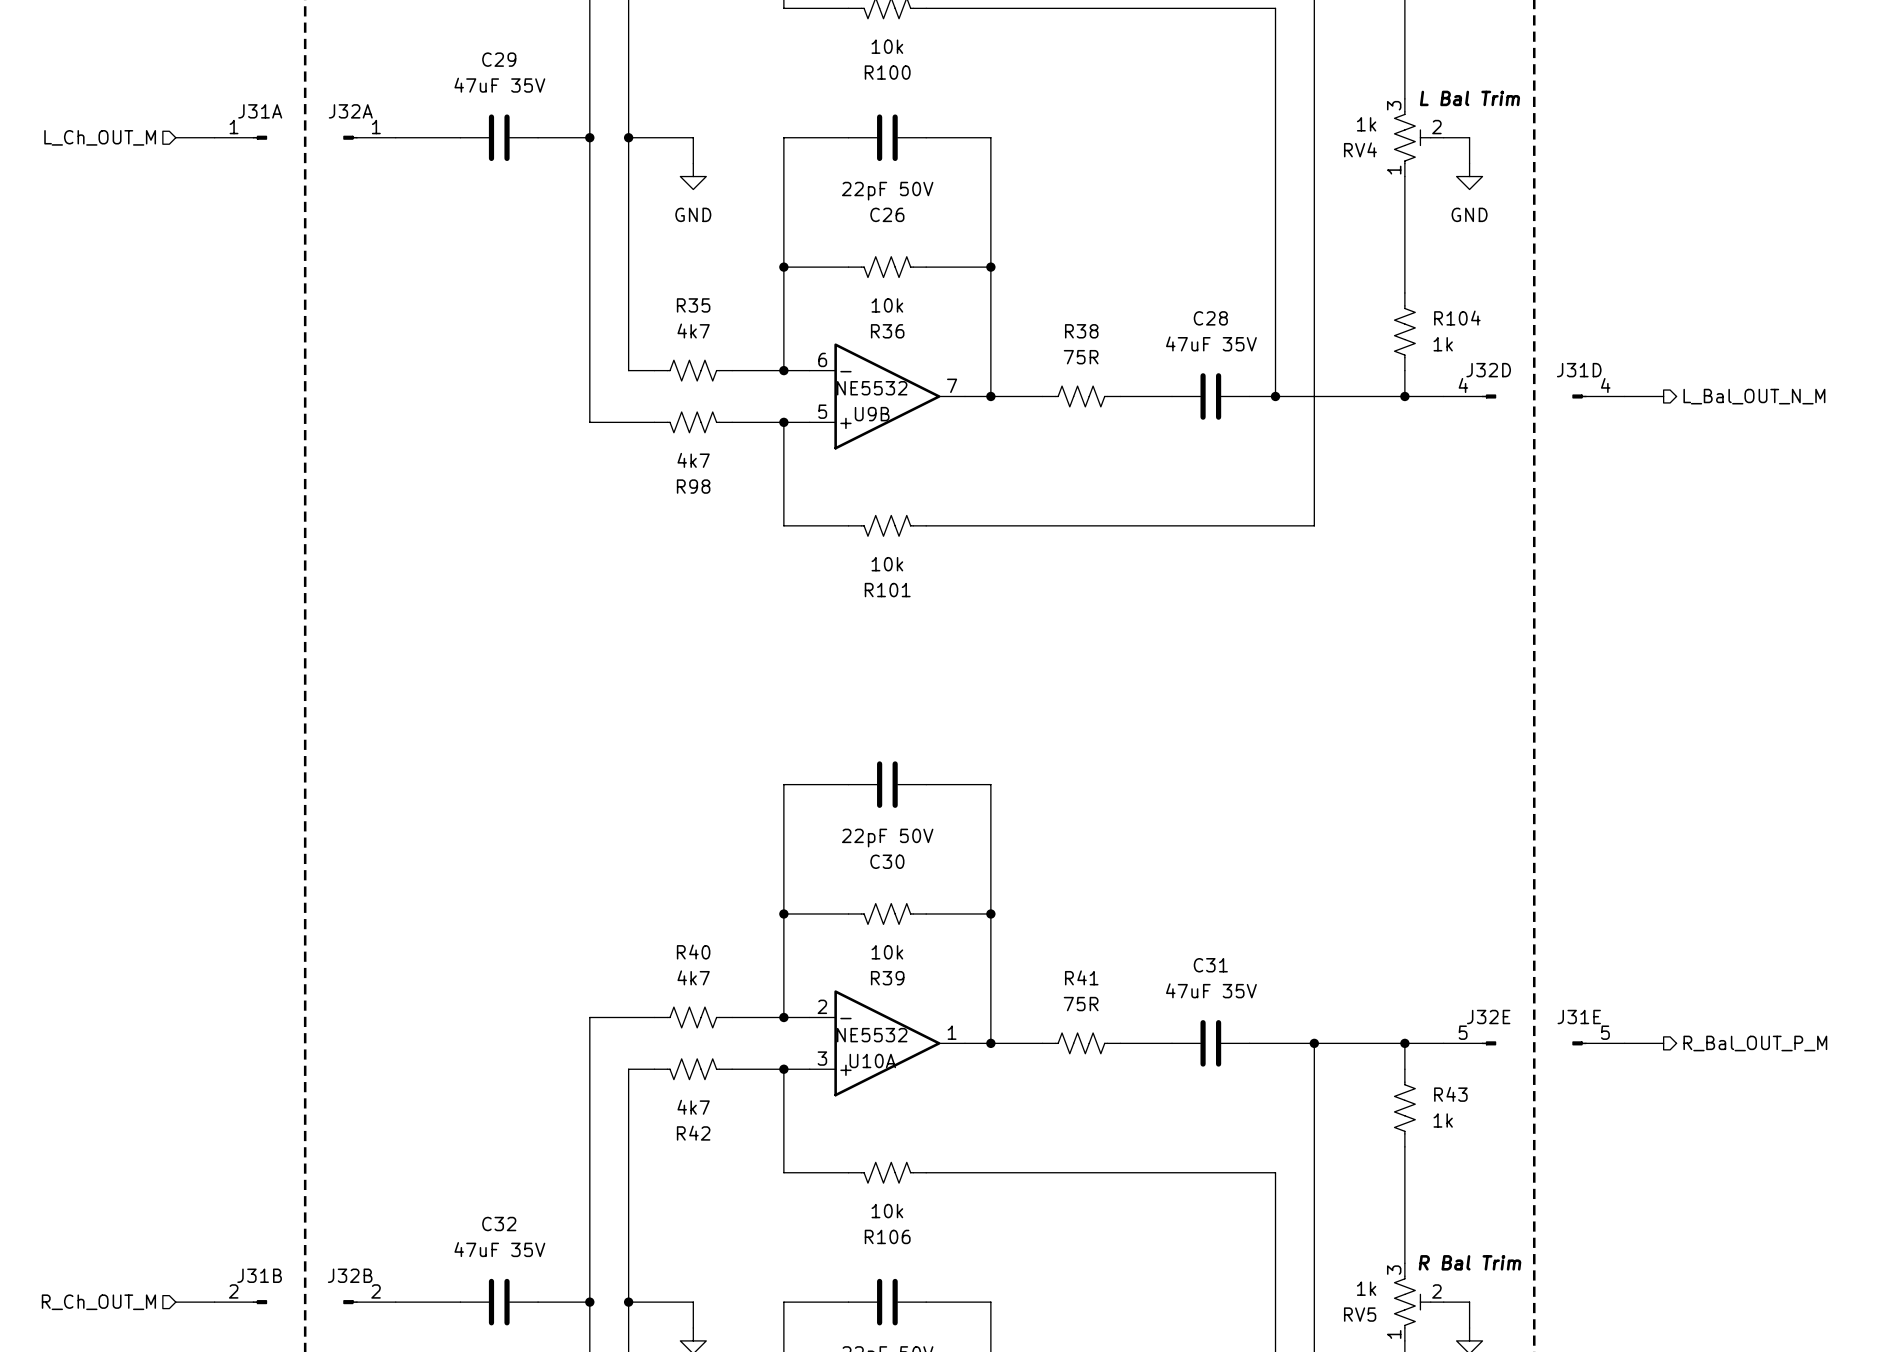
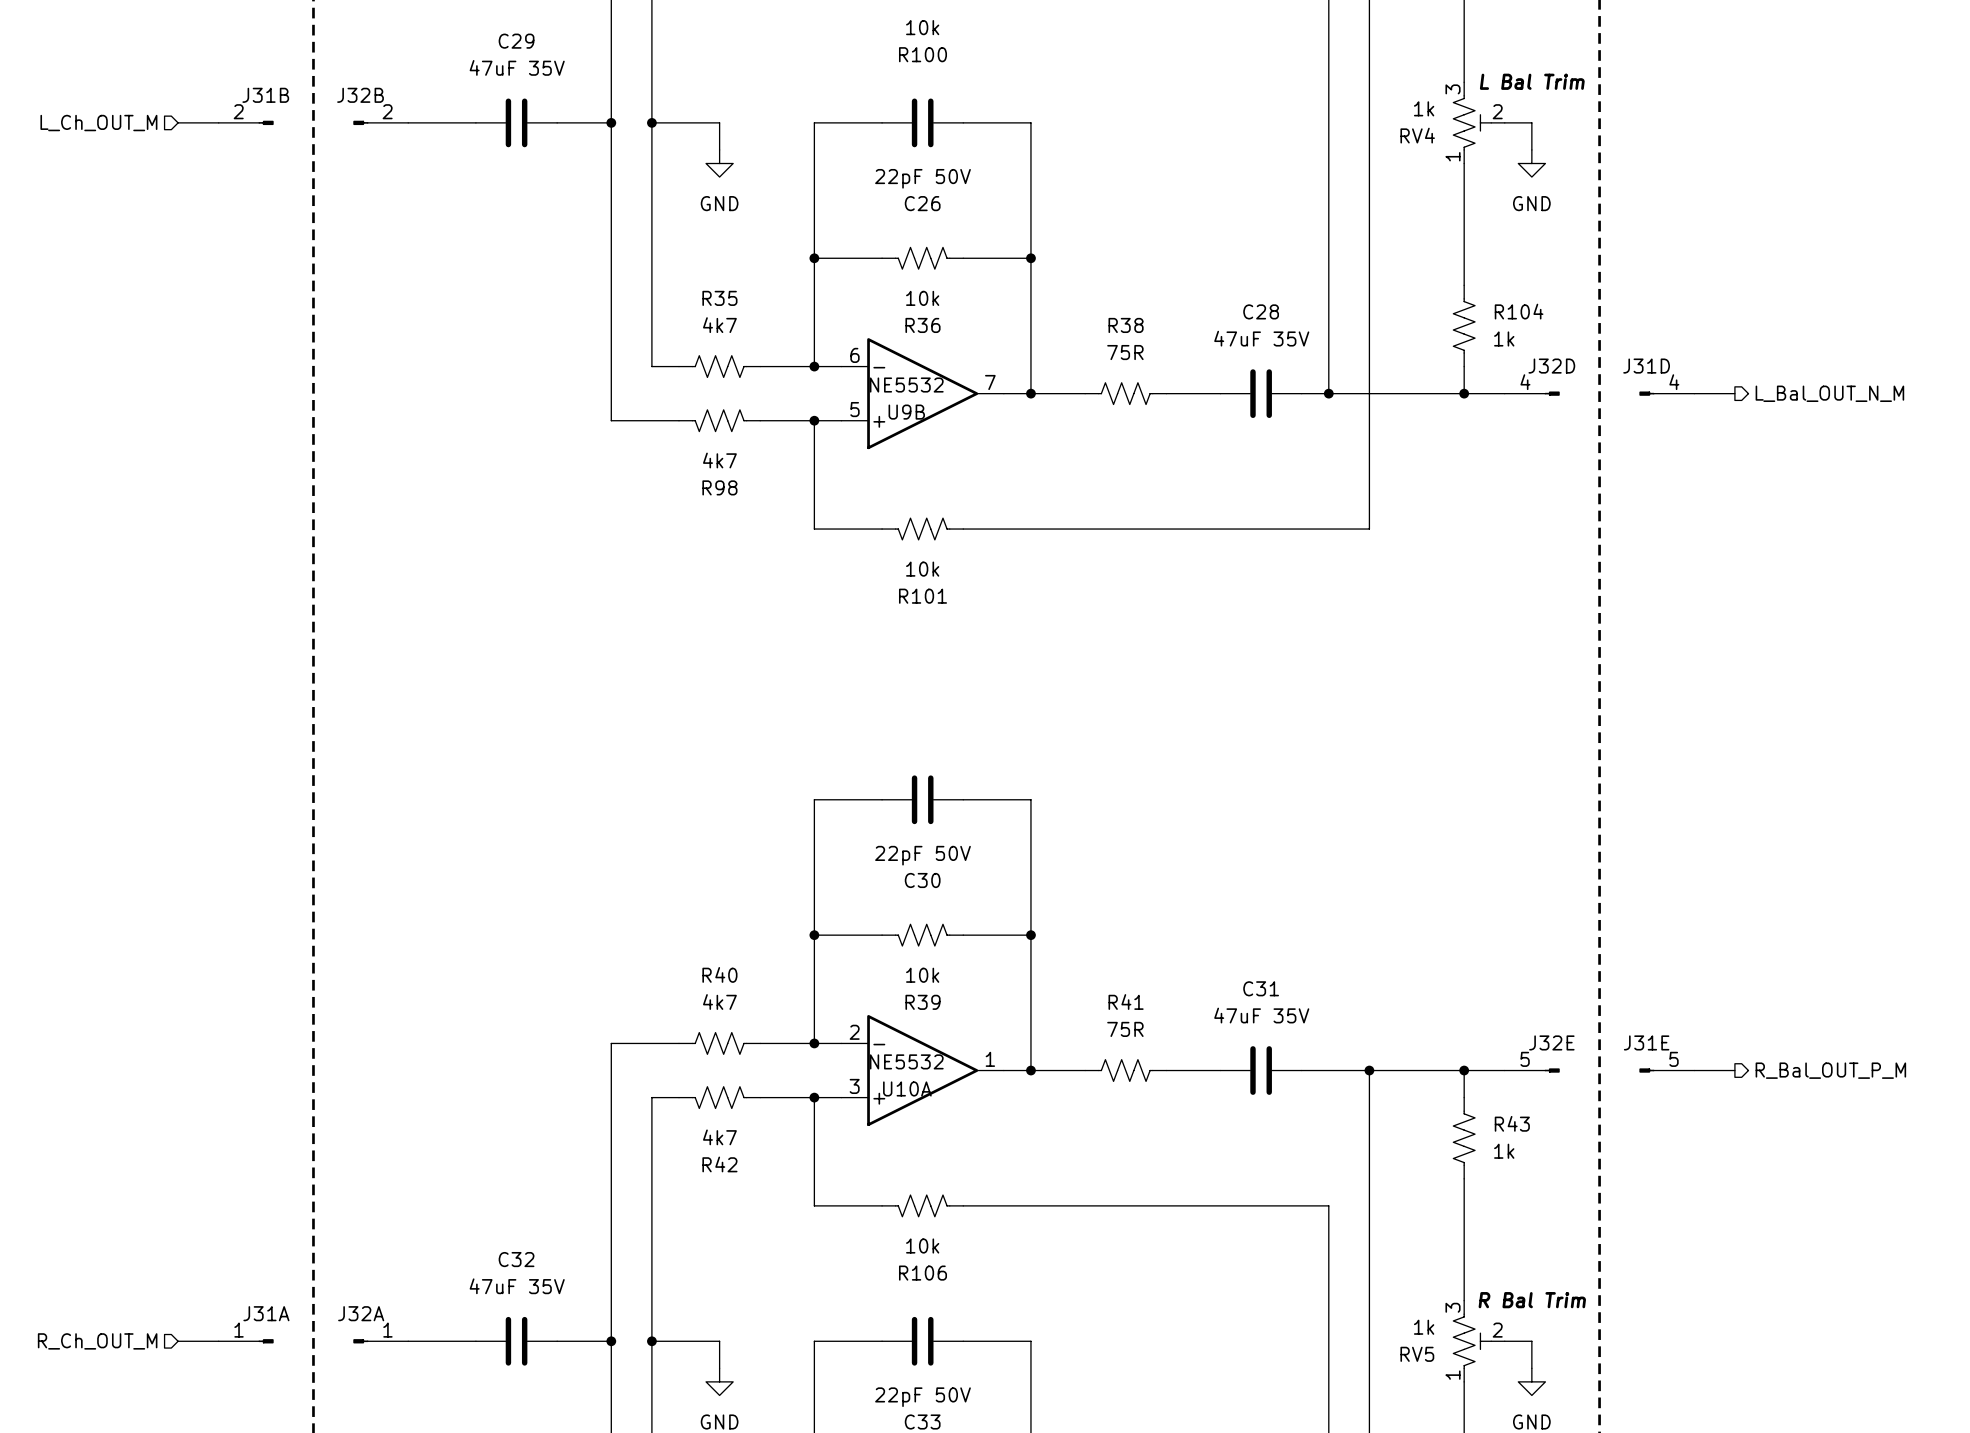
J31A position: (240, 137) -> (246, 1341)
J32A position: (369, 137) -> (380, 1341)
J31B position: (240, 1302) -> (246, 122)
J32B position: (369, 1302) -> (380, 122)

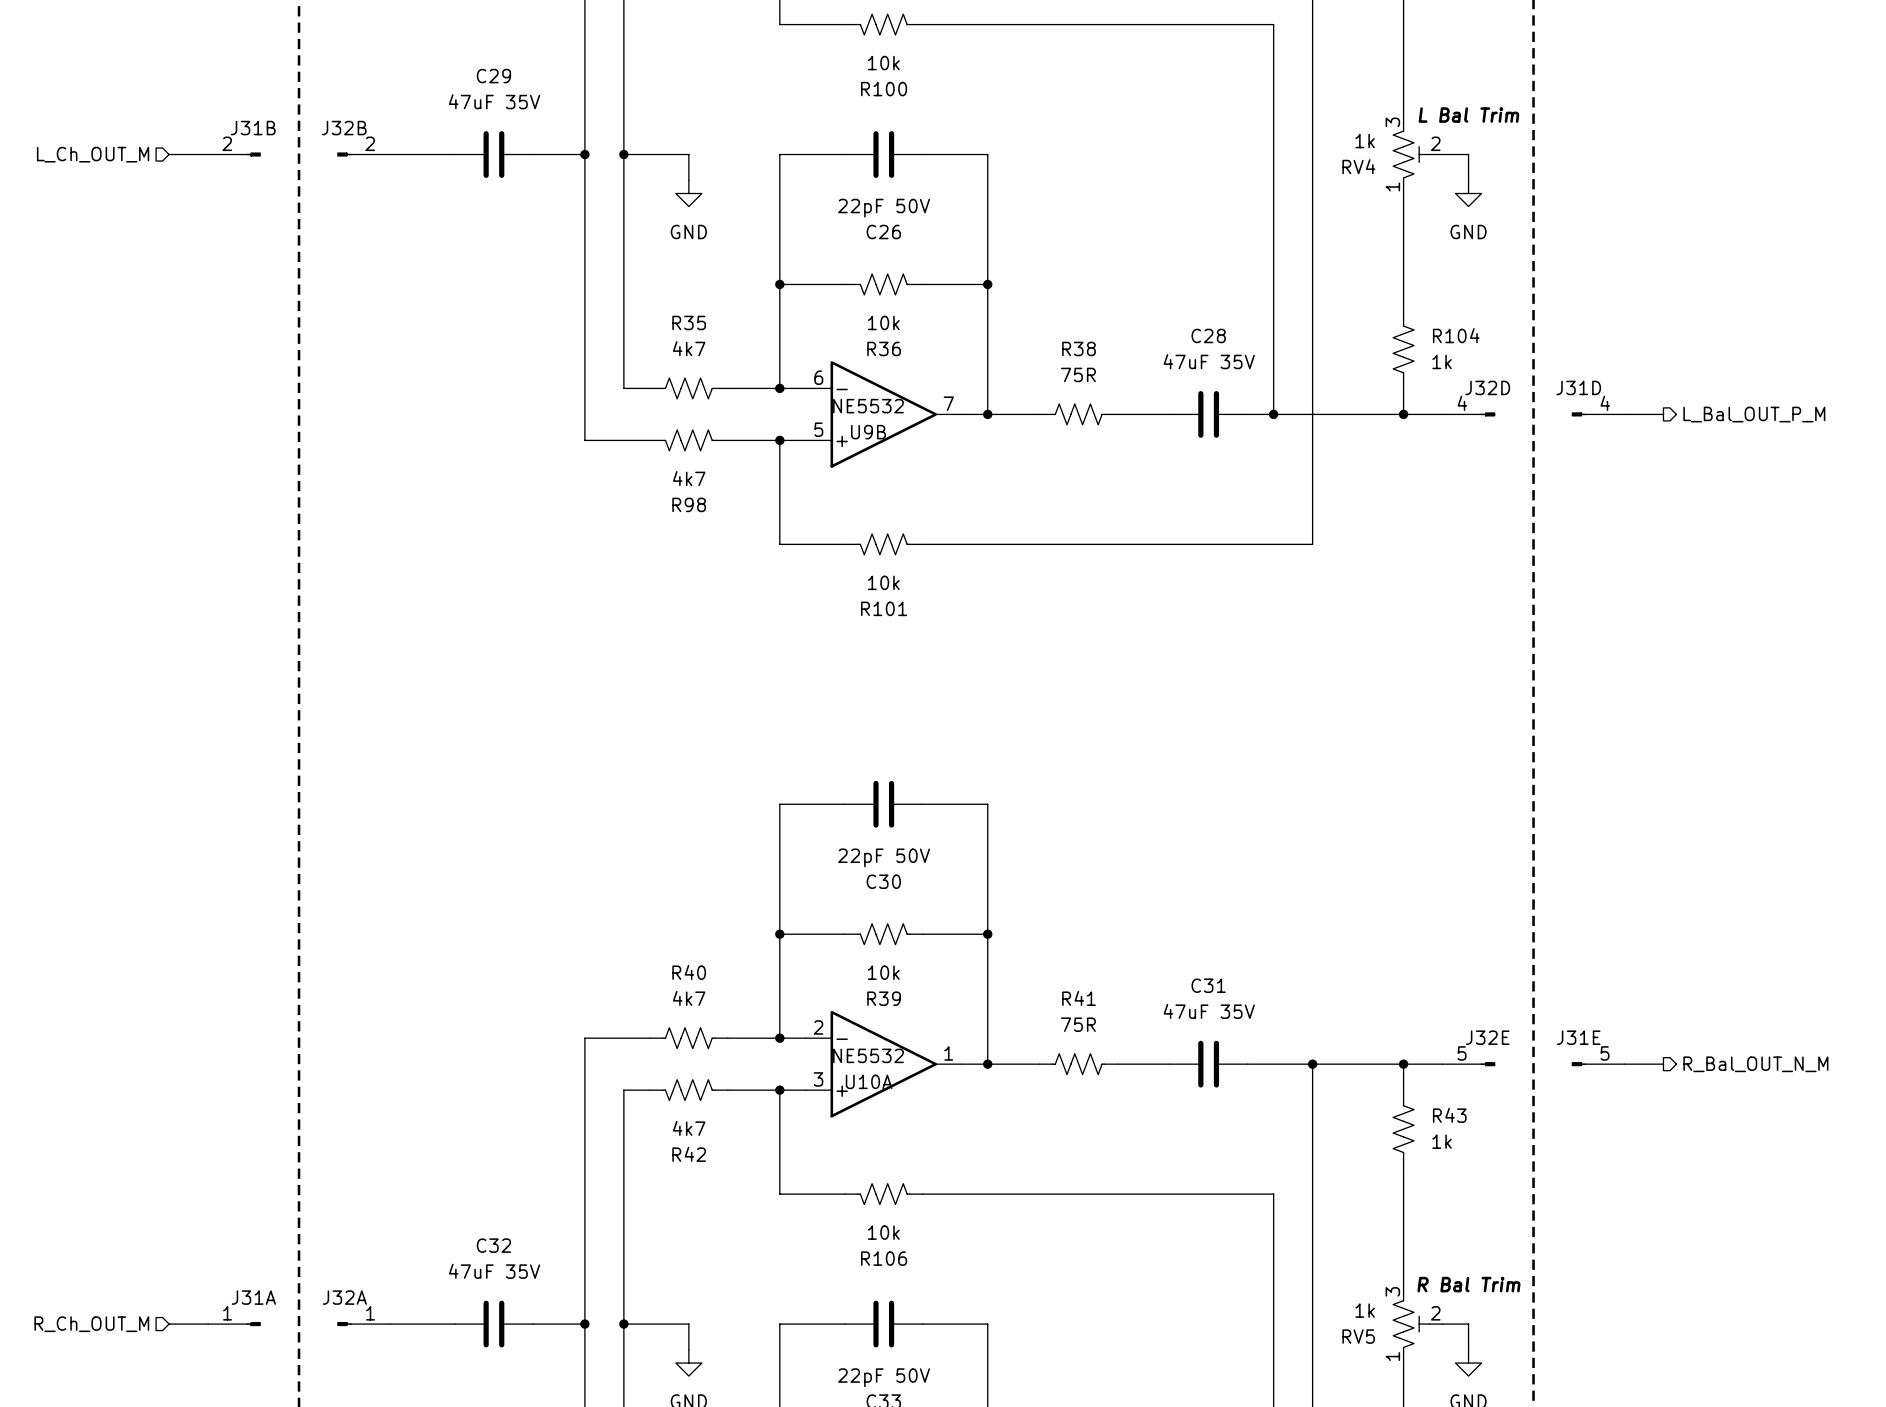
hierarchical label: L_Bal_OUT_N_M (1829, 393) -> L_Bal_OUT_P_M (1754, 414)
hierarchical label: R_Bal_OUT_P_M (1830, 1070) -> R_Bal_OUT_N_M (1755, 1064)

